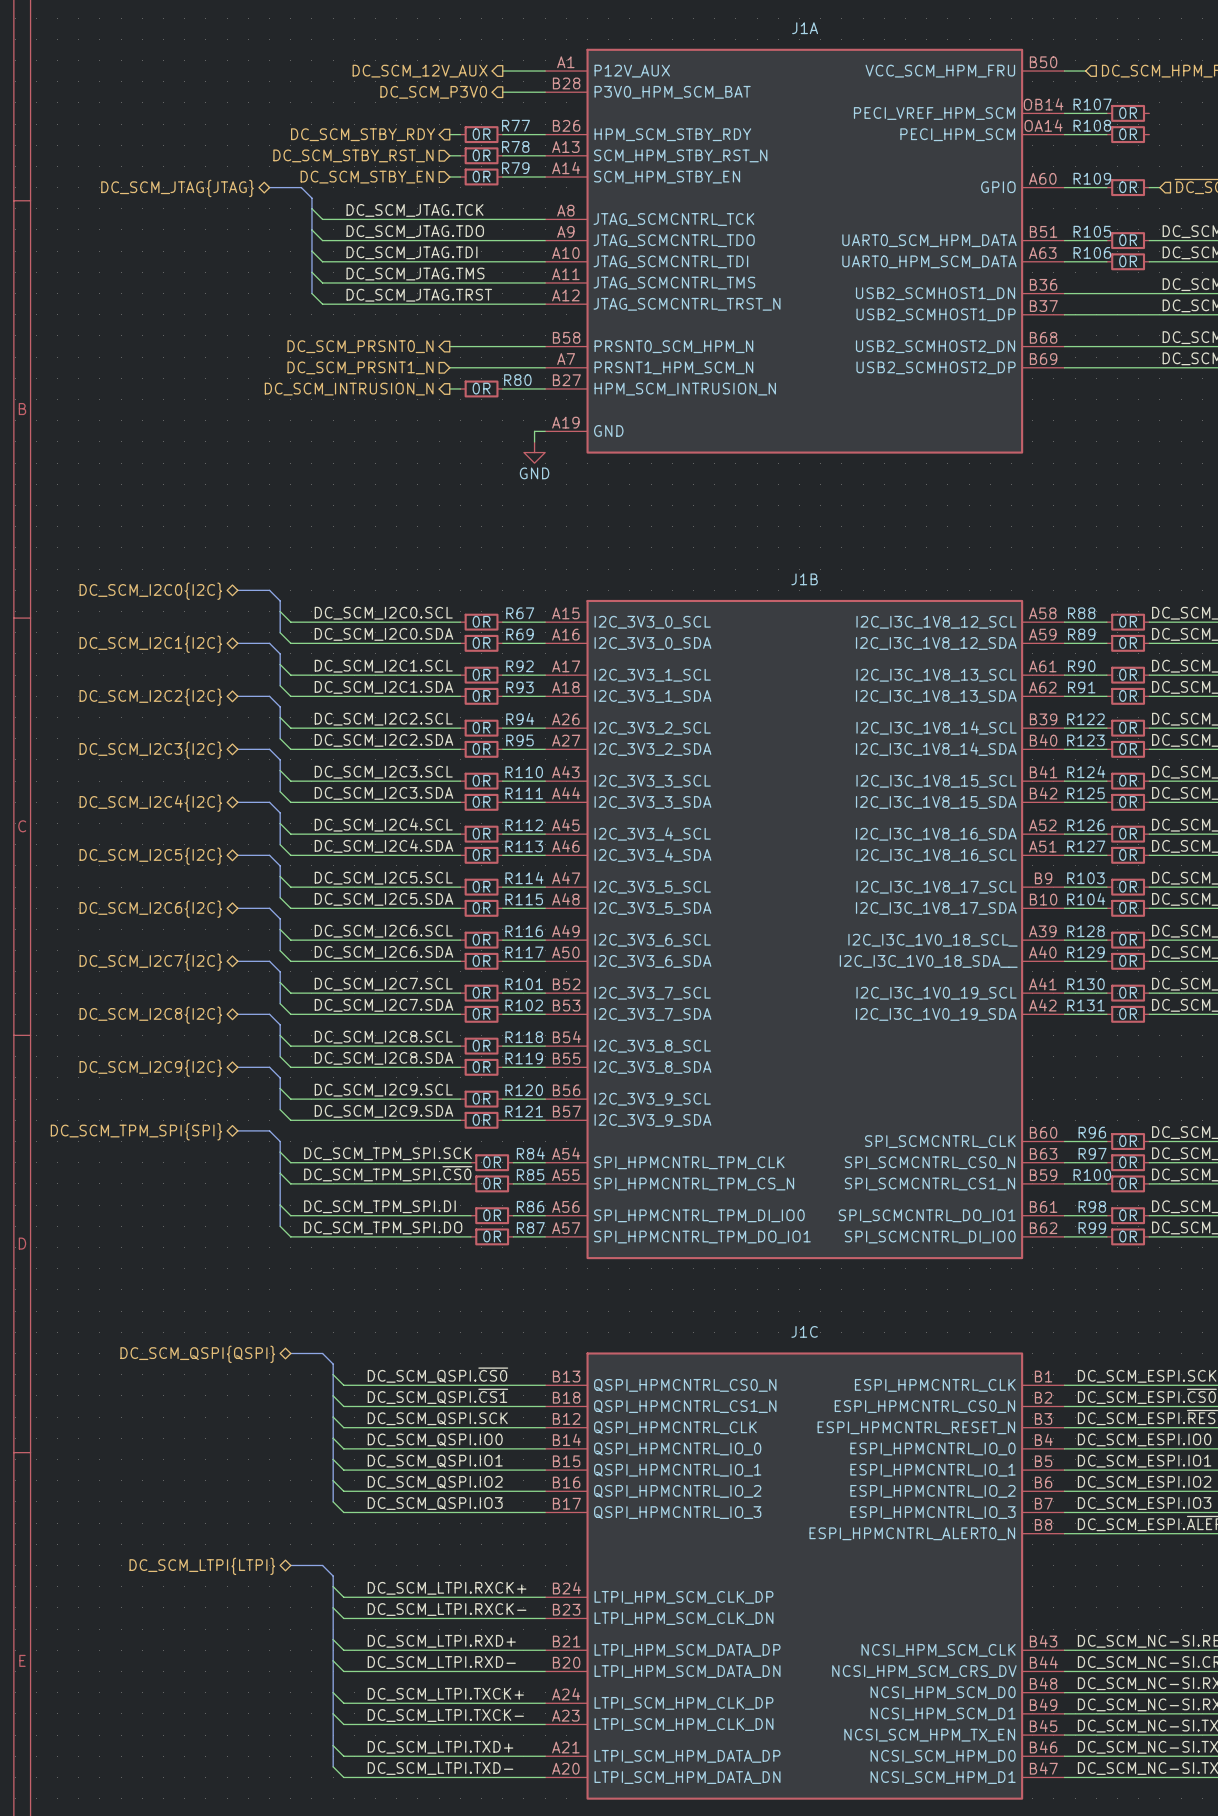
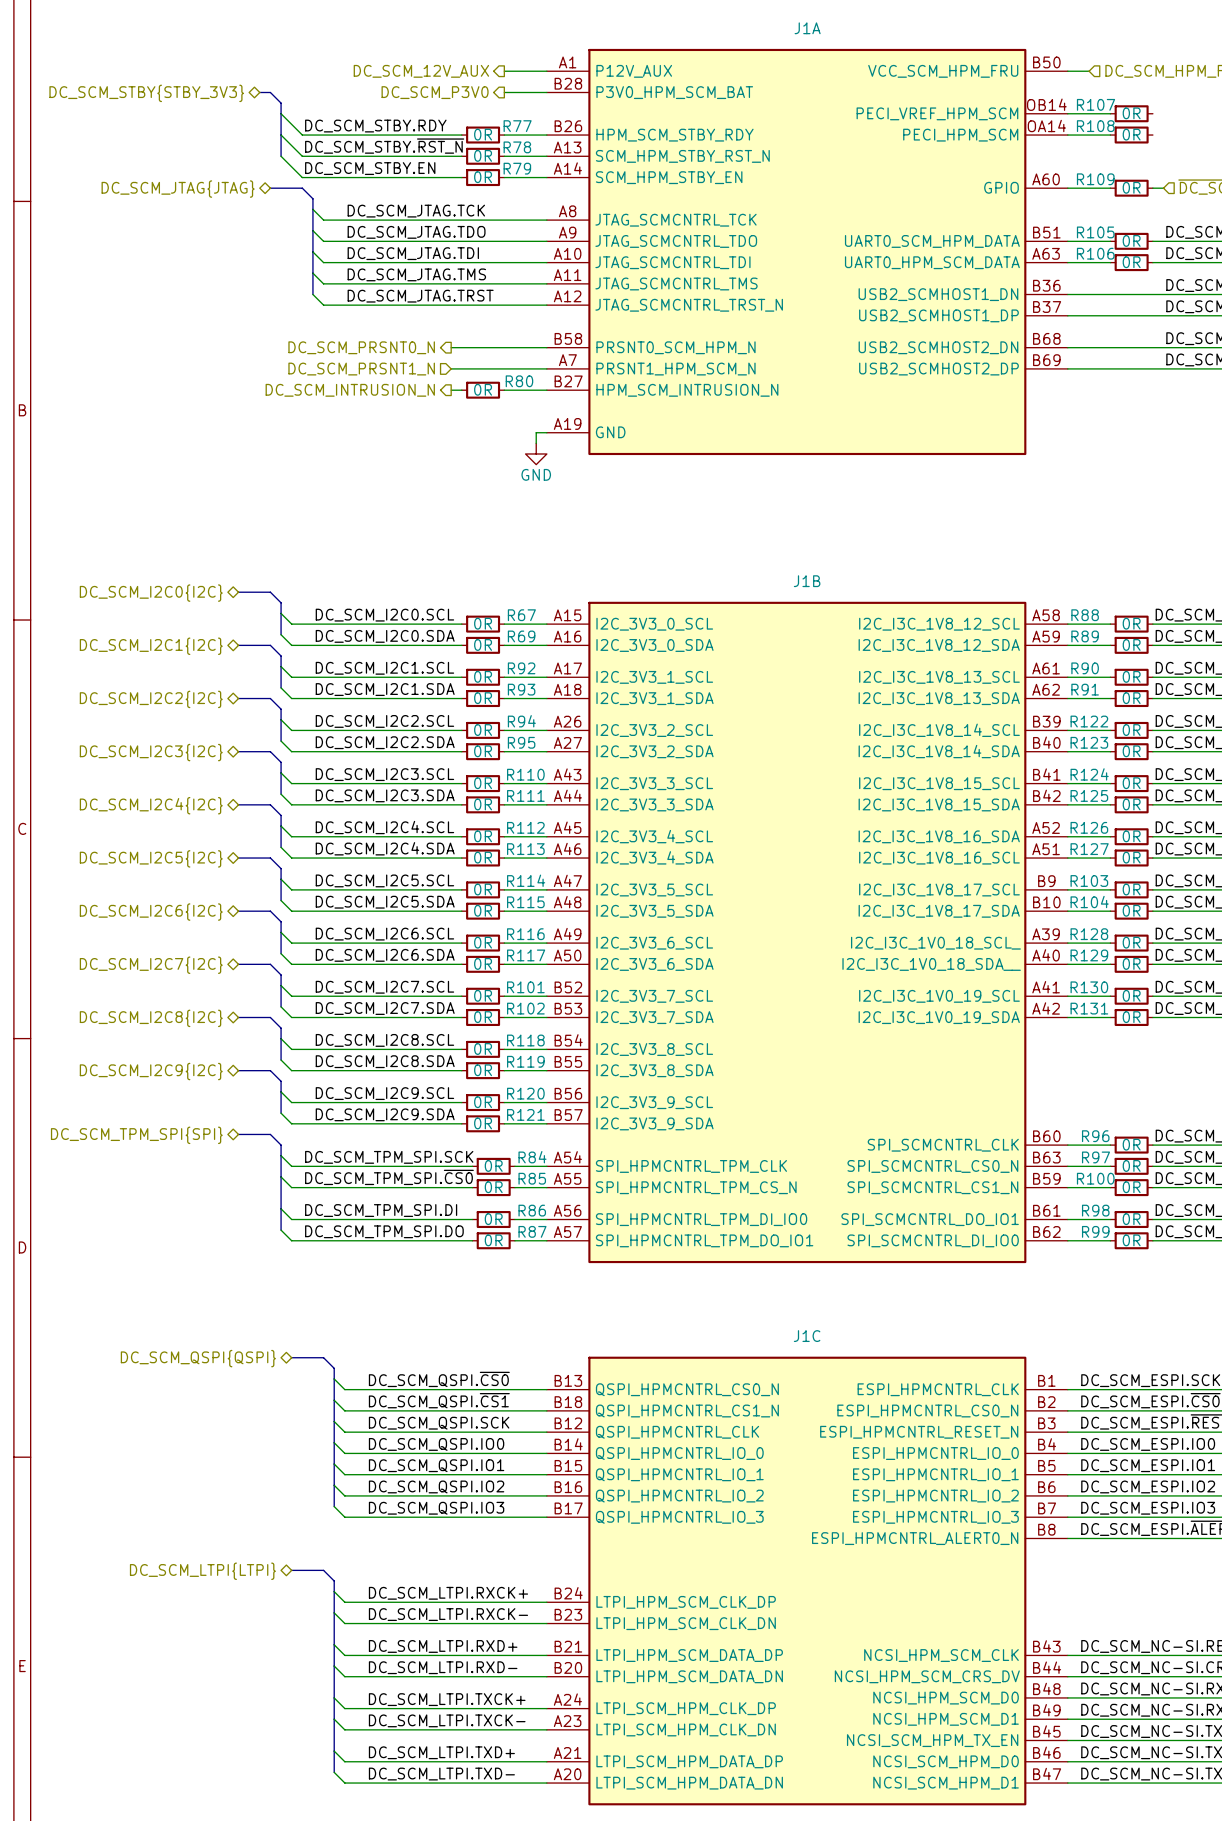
bus: none -> (259, 92) (270, 92) (281, 103) (281, 156)
hierarchical label: none -> DC_SCM_STBY{STBY_3V3} (146, 93)
wire: none -> (281, 113) (302, 135) (451, 135)
label: none -> DC_SCM_STBY.RDY (375, 126)
wire: none -> (281, 135) (302, 156) (451, 156)
hierarchical label: DC_SCM_STBY_RDY (363, 134) -> none
label: none -> DC_SCM_STBY.~{RST_N} (384, 146)
wire: none -> (281, 156) (302, 177) (451, 177)
hierarchical label: DC_SCM_STBY_RST_N (353, 155) -> none
label: none -> DC_SCM_STBY.EN (370, 168)
hierarchical label: DC_SCM_STBY_EN (367, 177) -> none

